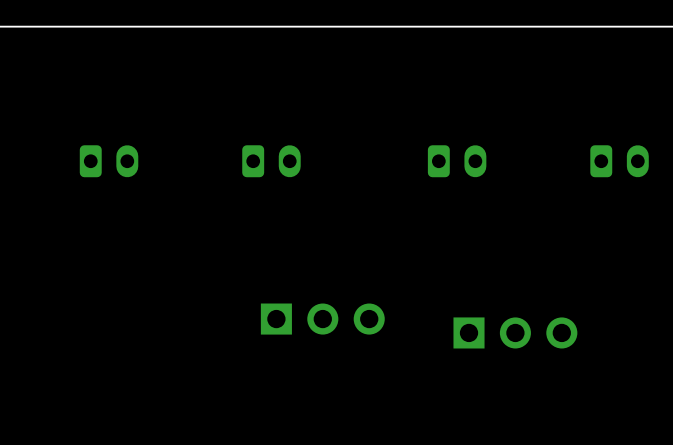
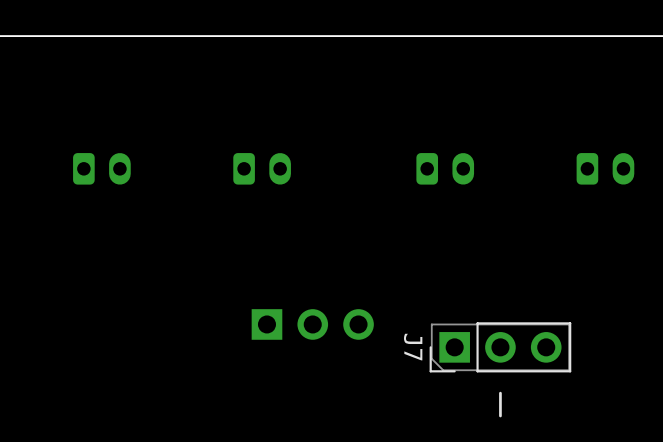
J7 side: top (515, 332) -> bottom (500, 347)
line: none -> (500, 393) (500, 416)

